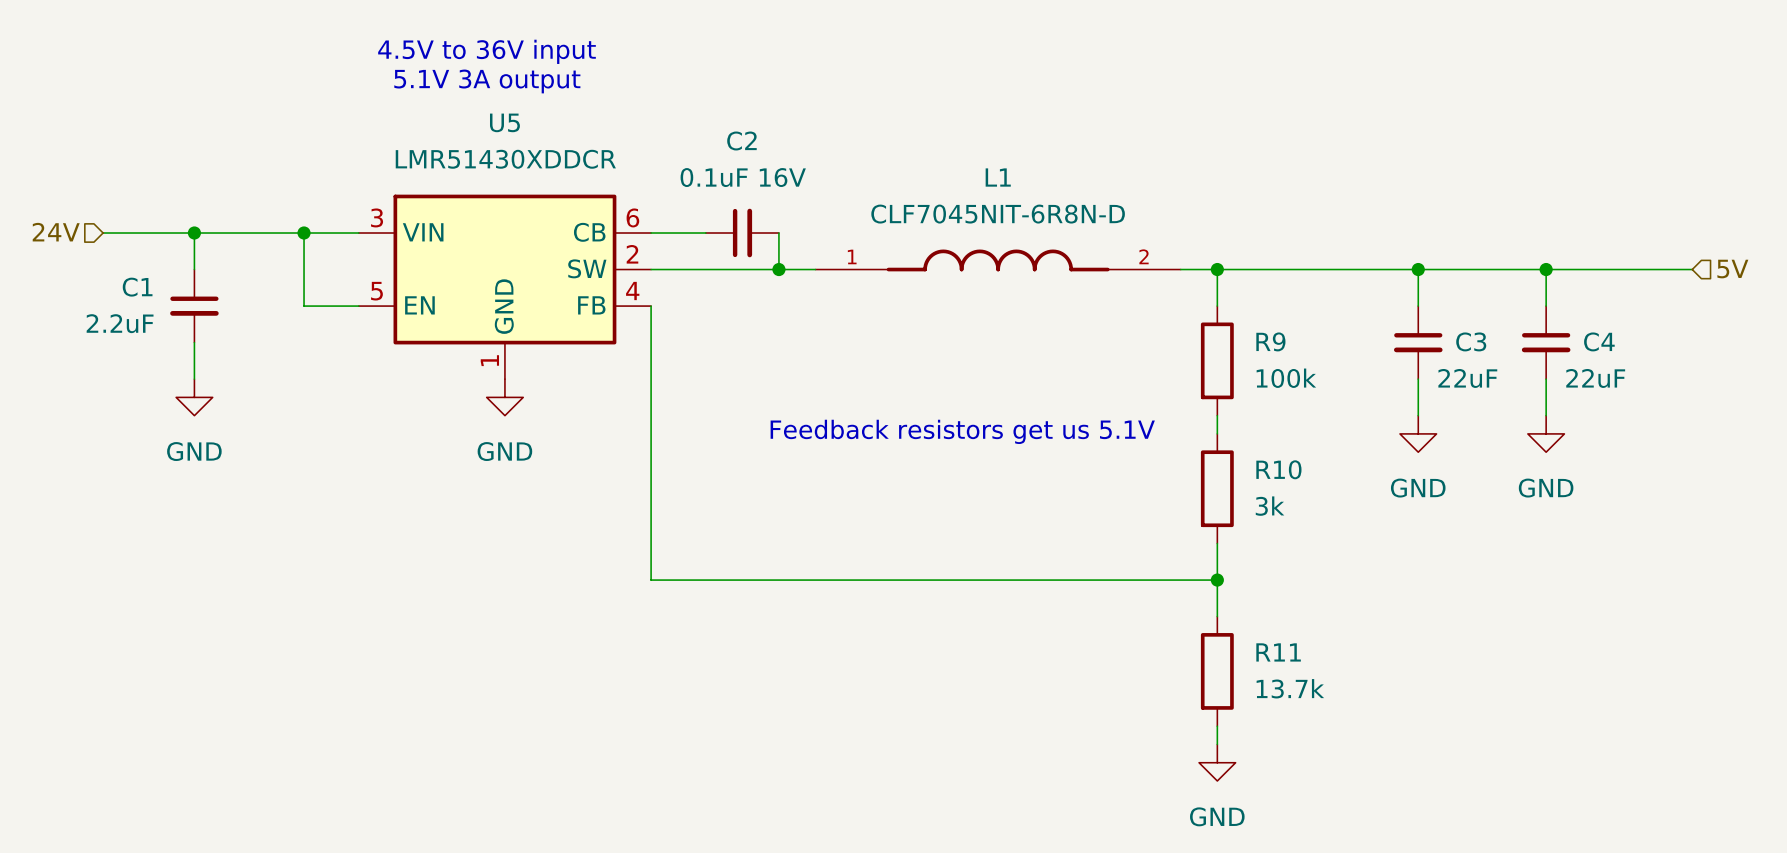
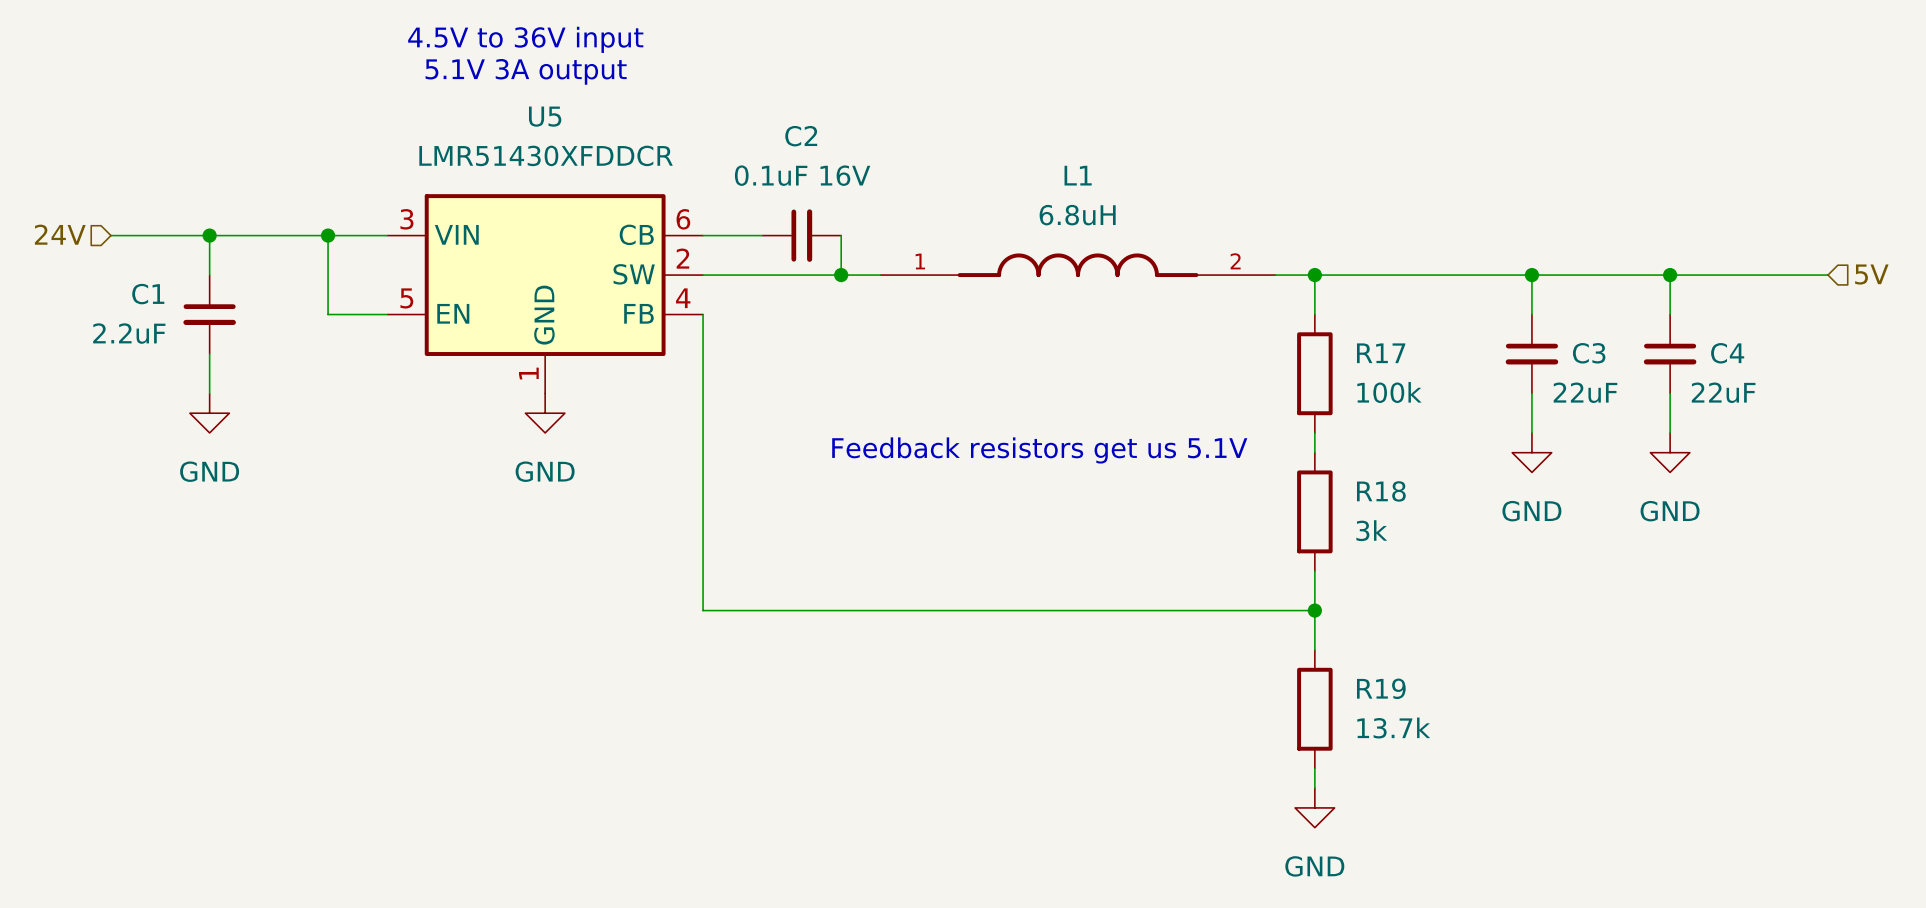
U5 value: LMR51430XDDCR (505, 159) -> LMR51430XFDDCR (546, 155)
L1 value: CLF7045NIT-6R8N-D (998, 214) -> 6.8uH (1077, 215)
R9 name: R9 (1270, 341) -> R17 (1381, 353)
R10 name: R10 (1278, 469) -> R18 (1381, 491)
R11 name: R11 (1278, 652) -> R19 (1381, 688)

